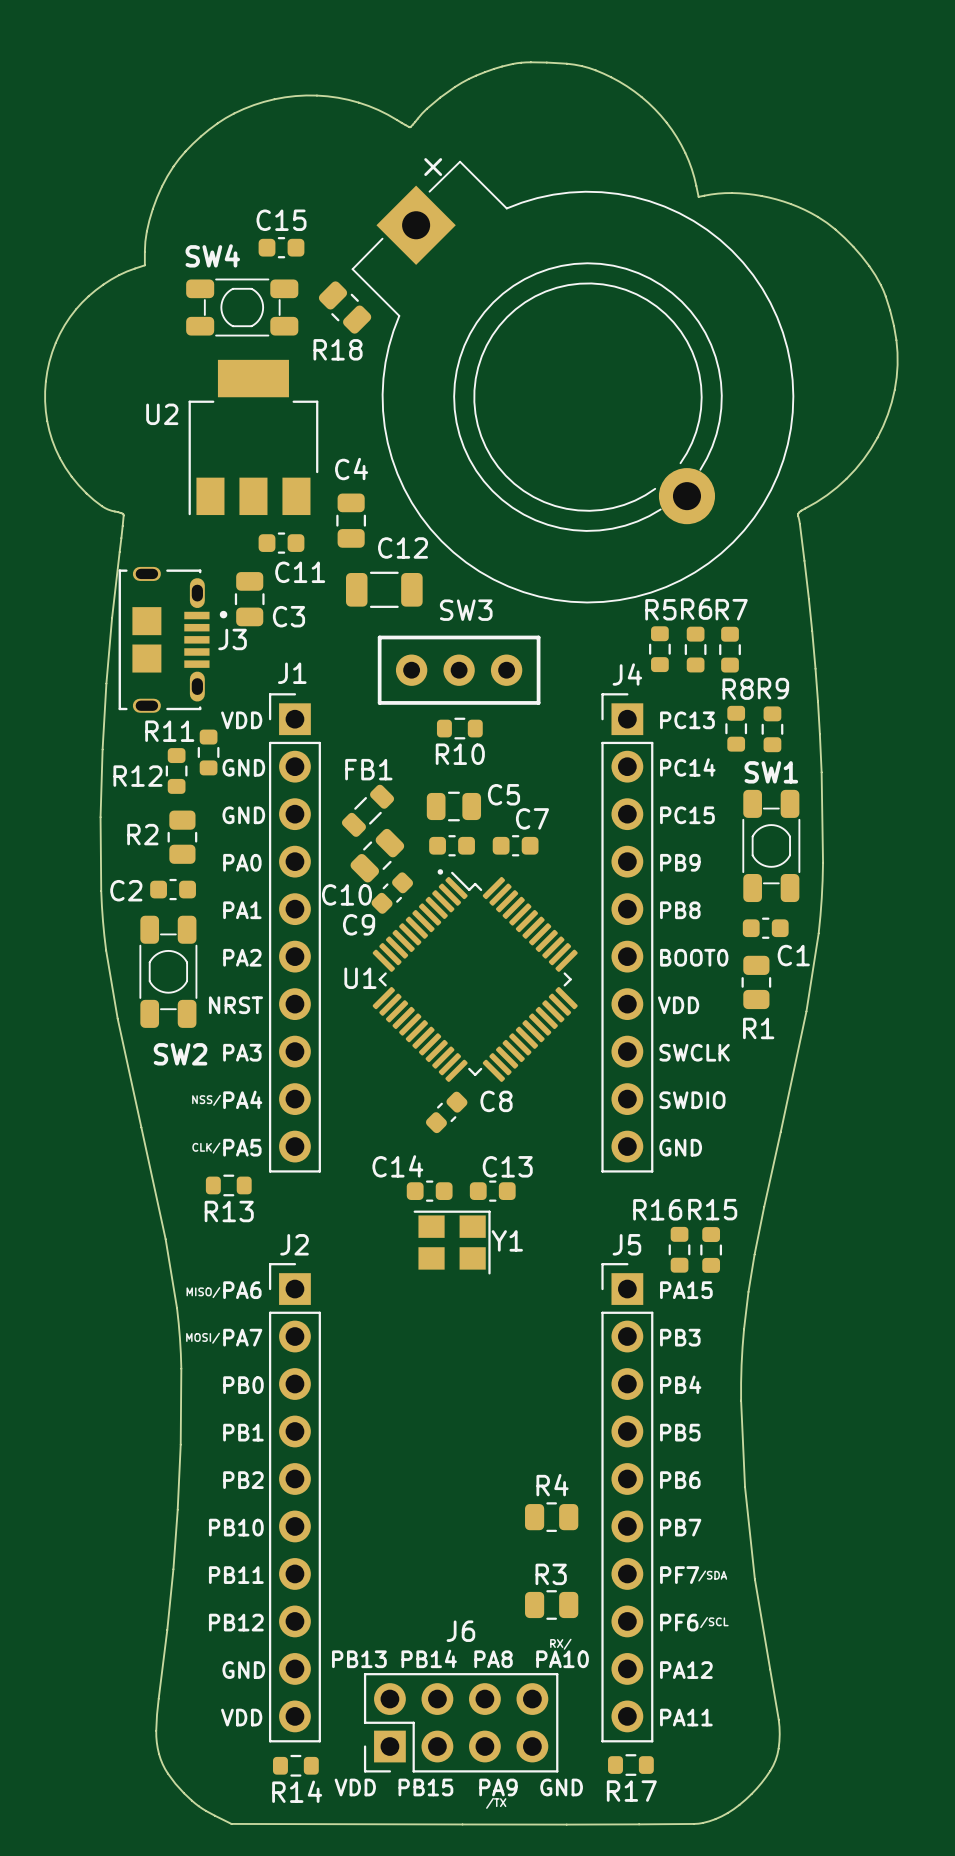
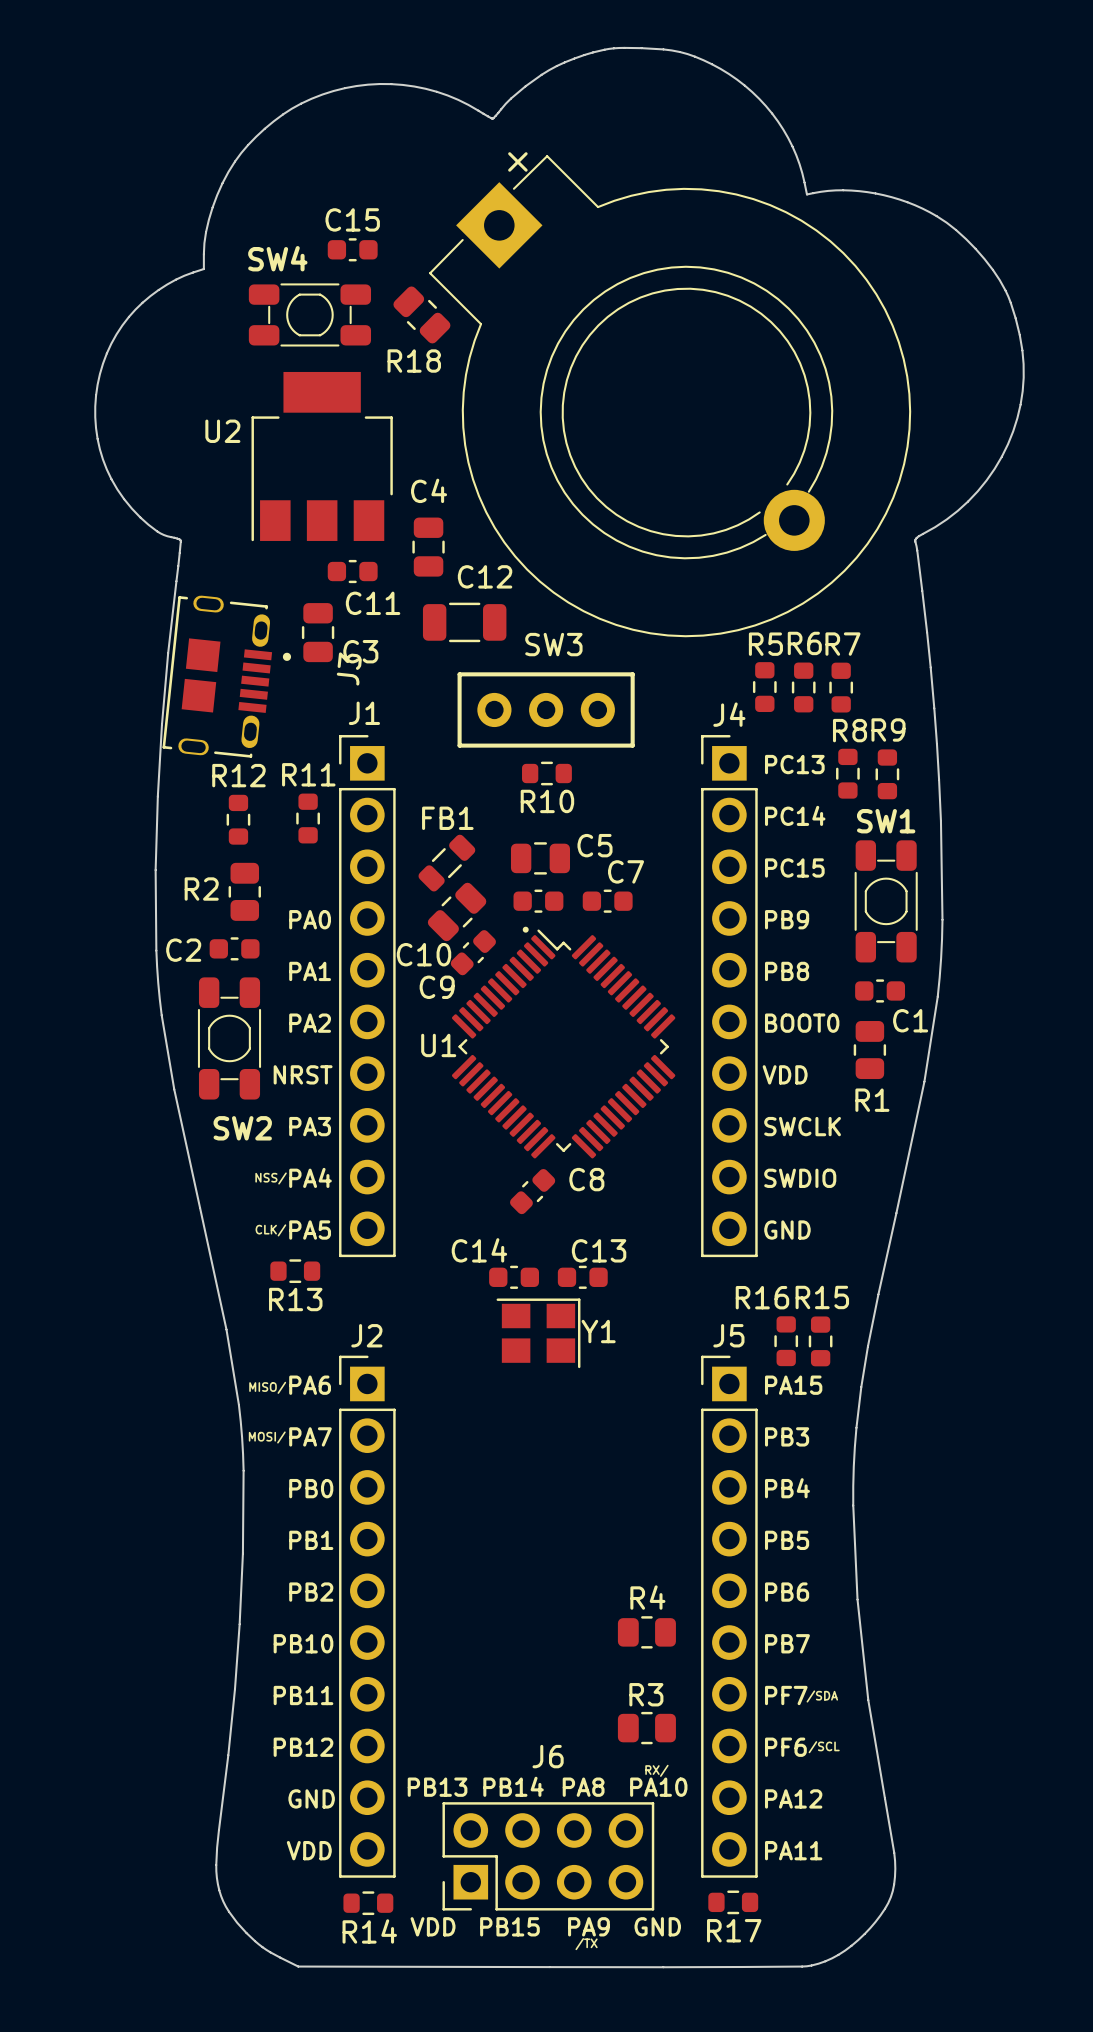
J3 rotation: 0° (172, 639) -> 6° clockwise (226, 676)
J3 name position: J3 (232, 639) -> J3 (349, 668)
text: VDD (241, 720) -> none
R11 name position: R11 (169, 731) -> R11 (308, 774)
R11 position: (208, 752) -> (308, 818)
text: GND (243, 767) -> none
R12 name position: R12 (137, 776) -> R12 (238, 775)
text: GND (243, 815) -> none

